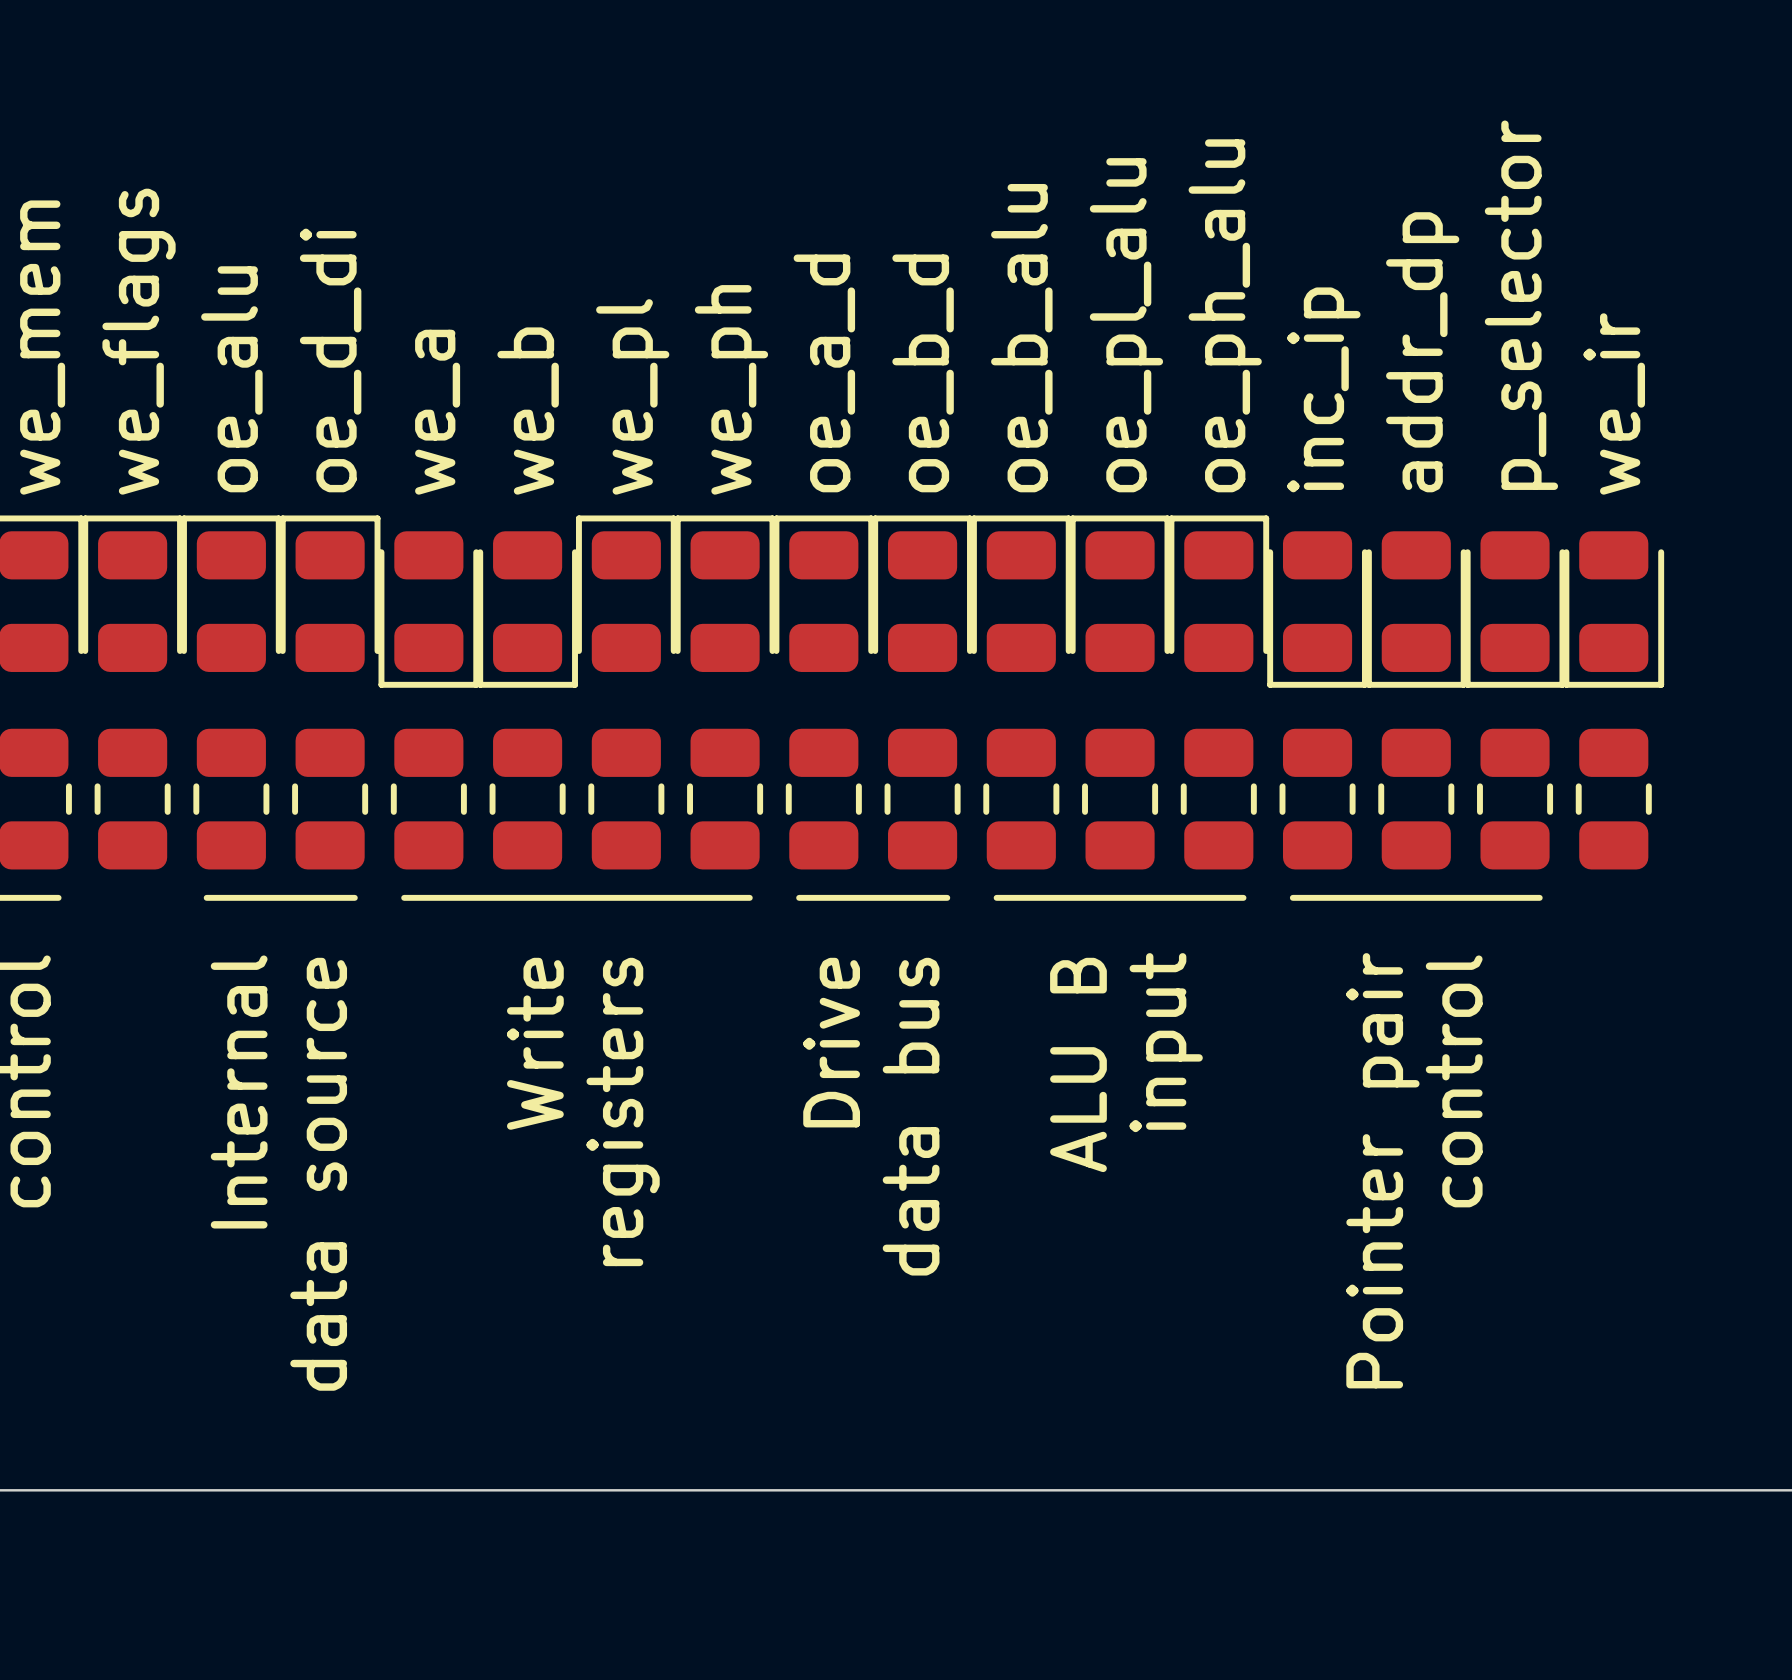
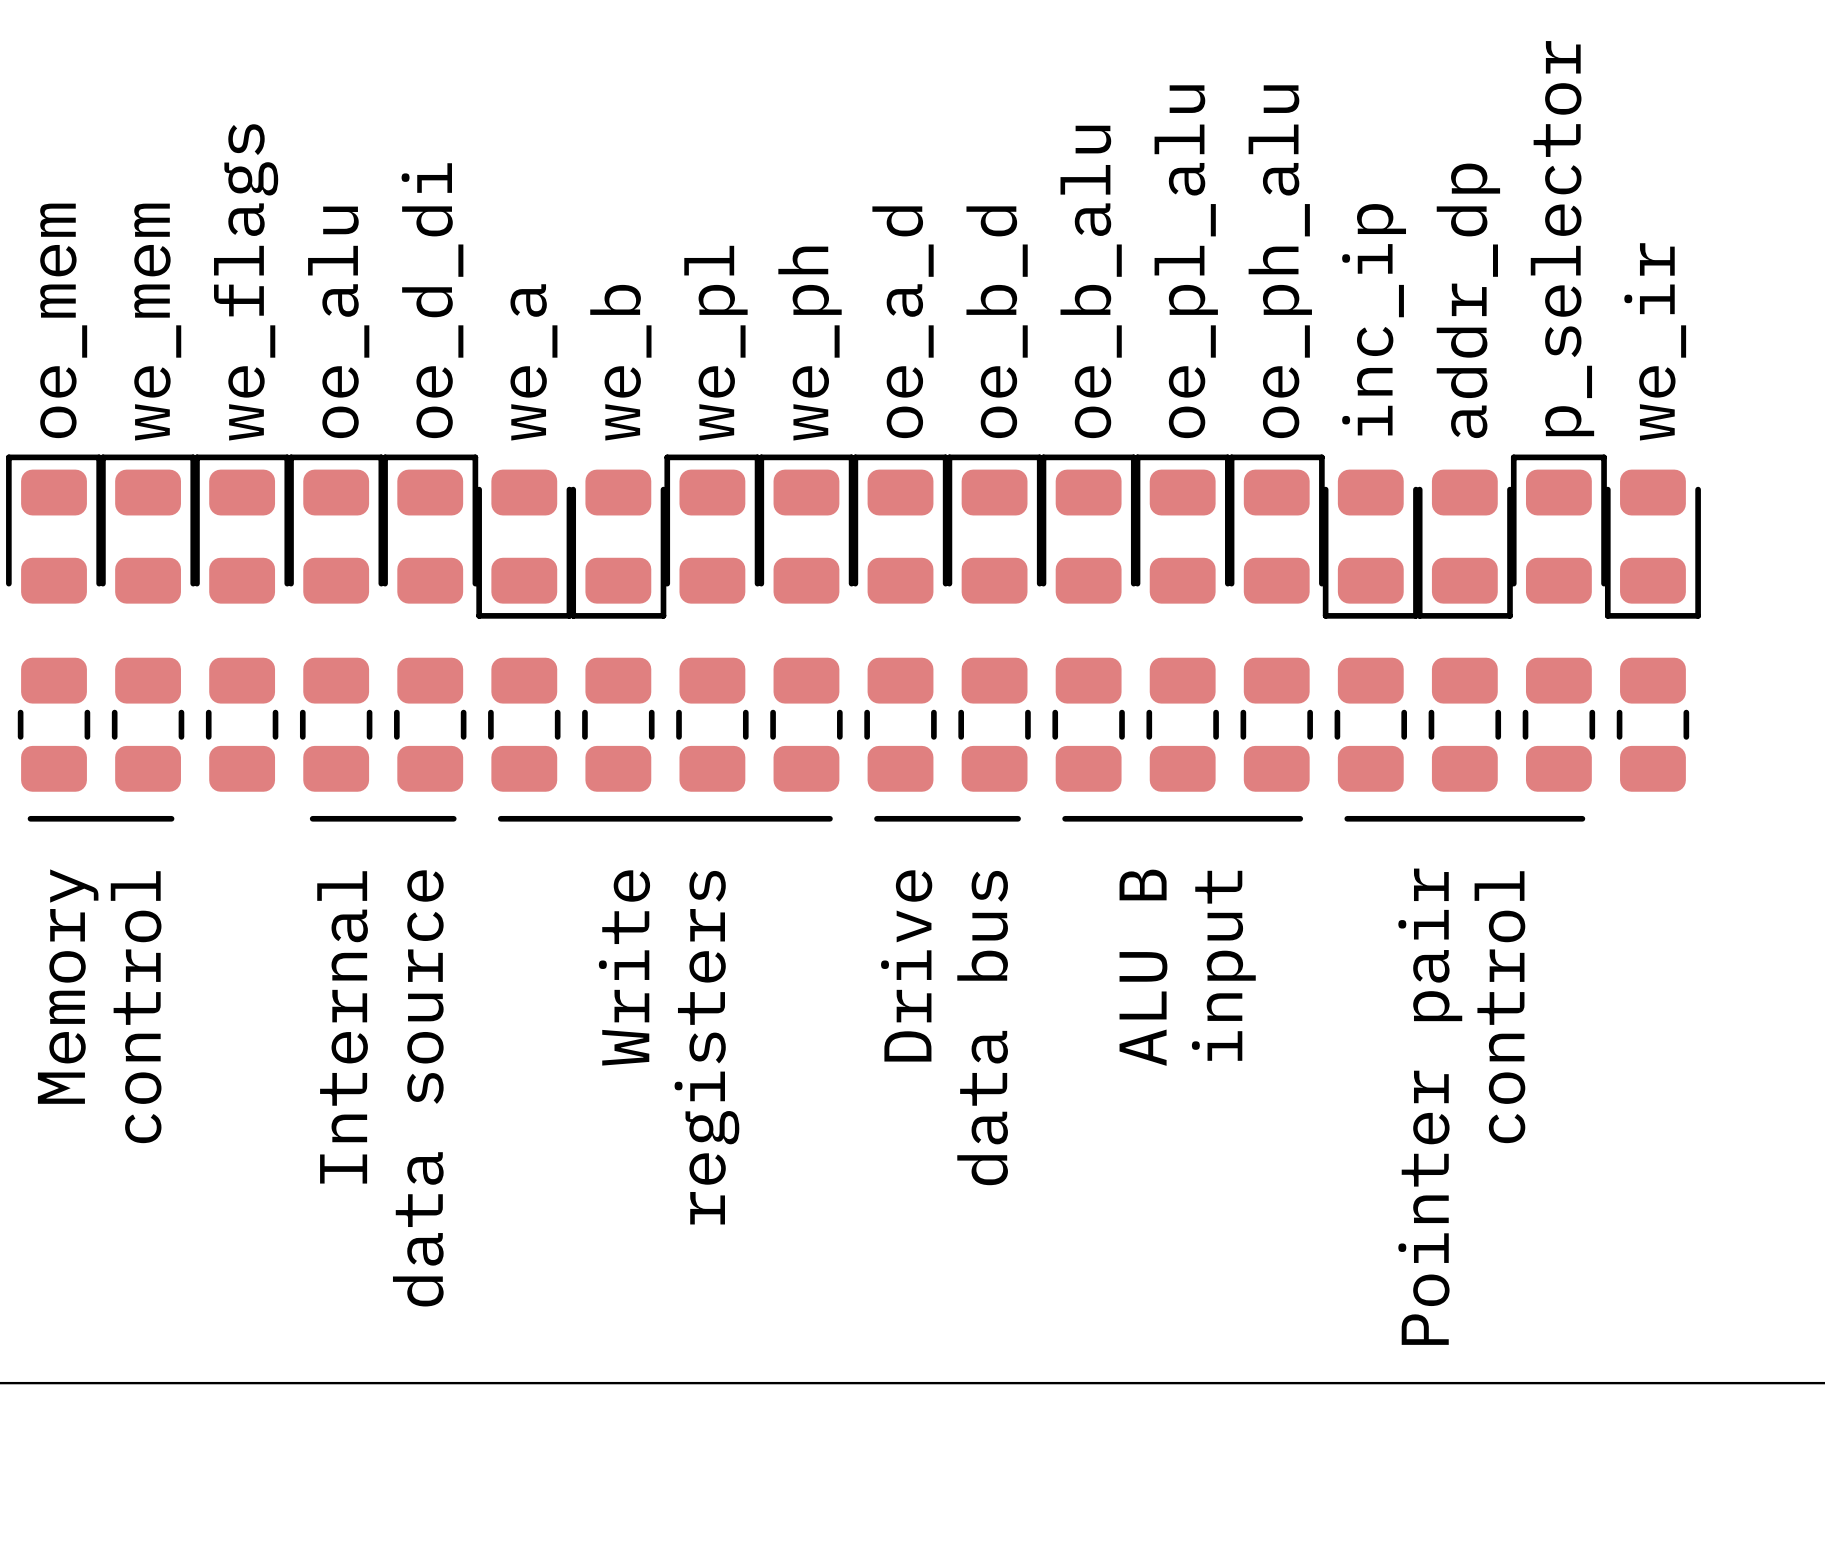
part rotation: 0° (1515, 609) -> 180° (1558, 529)

